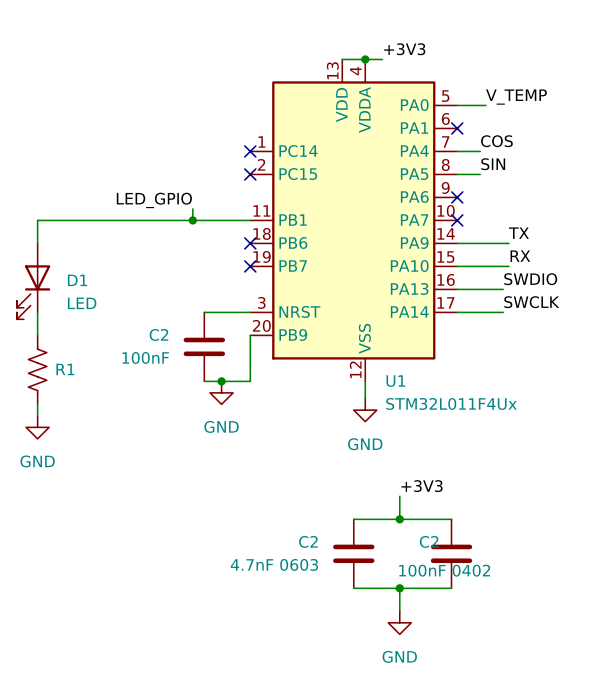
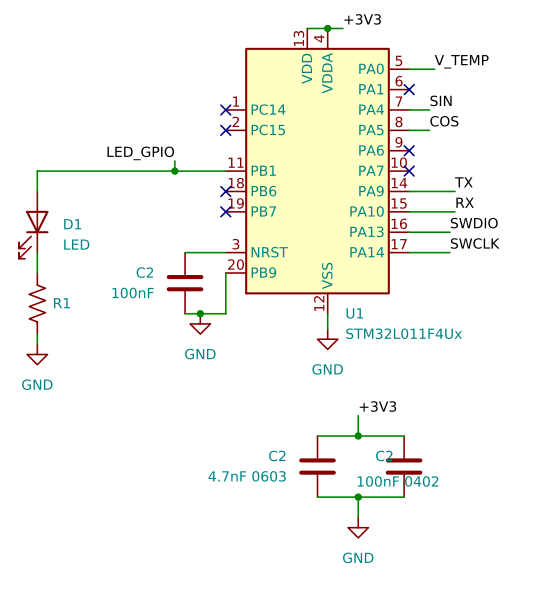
label: COS (496, 141) -> SIN (441, 100)
label: SIN (493, 164) -> COS (444, 121)

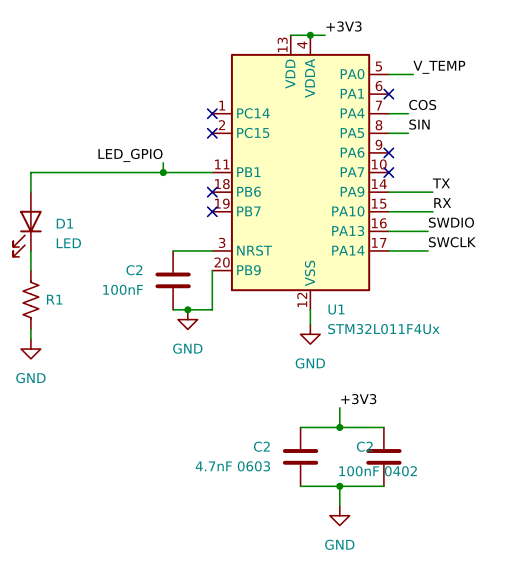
label: SIN (441, 100) -> COS (422, 104)
label: COS (444, 121) -> SIN (419, 124)

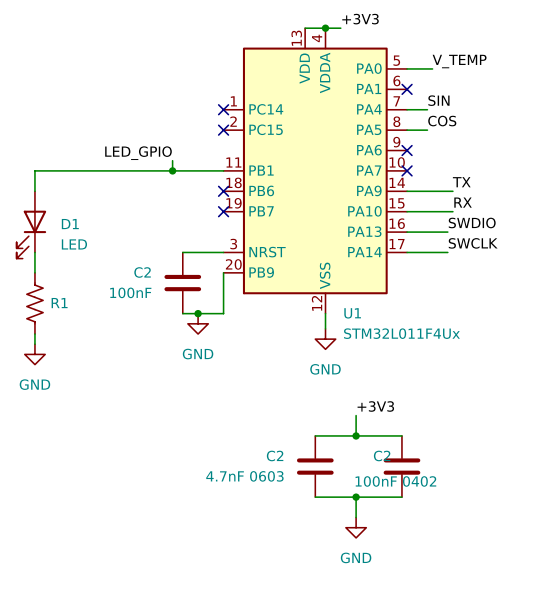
label: COS (422, 104) -> SIN (438, 100)
label: SIN (419, 124) -> COS (442, 121)

